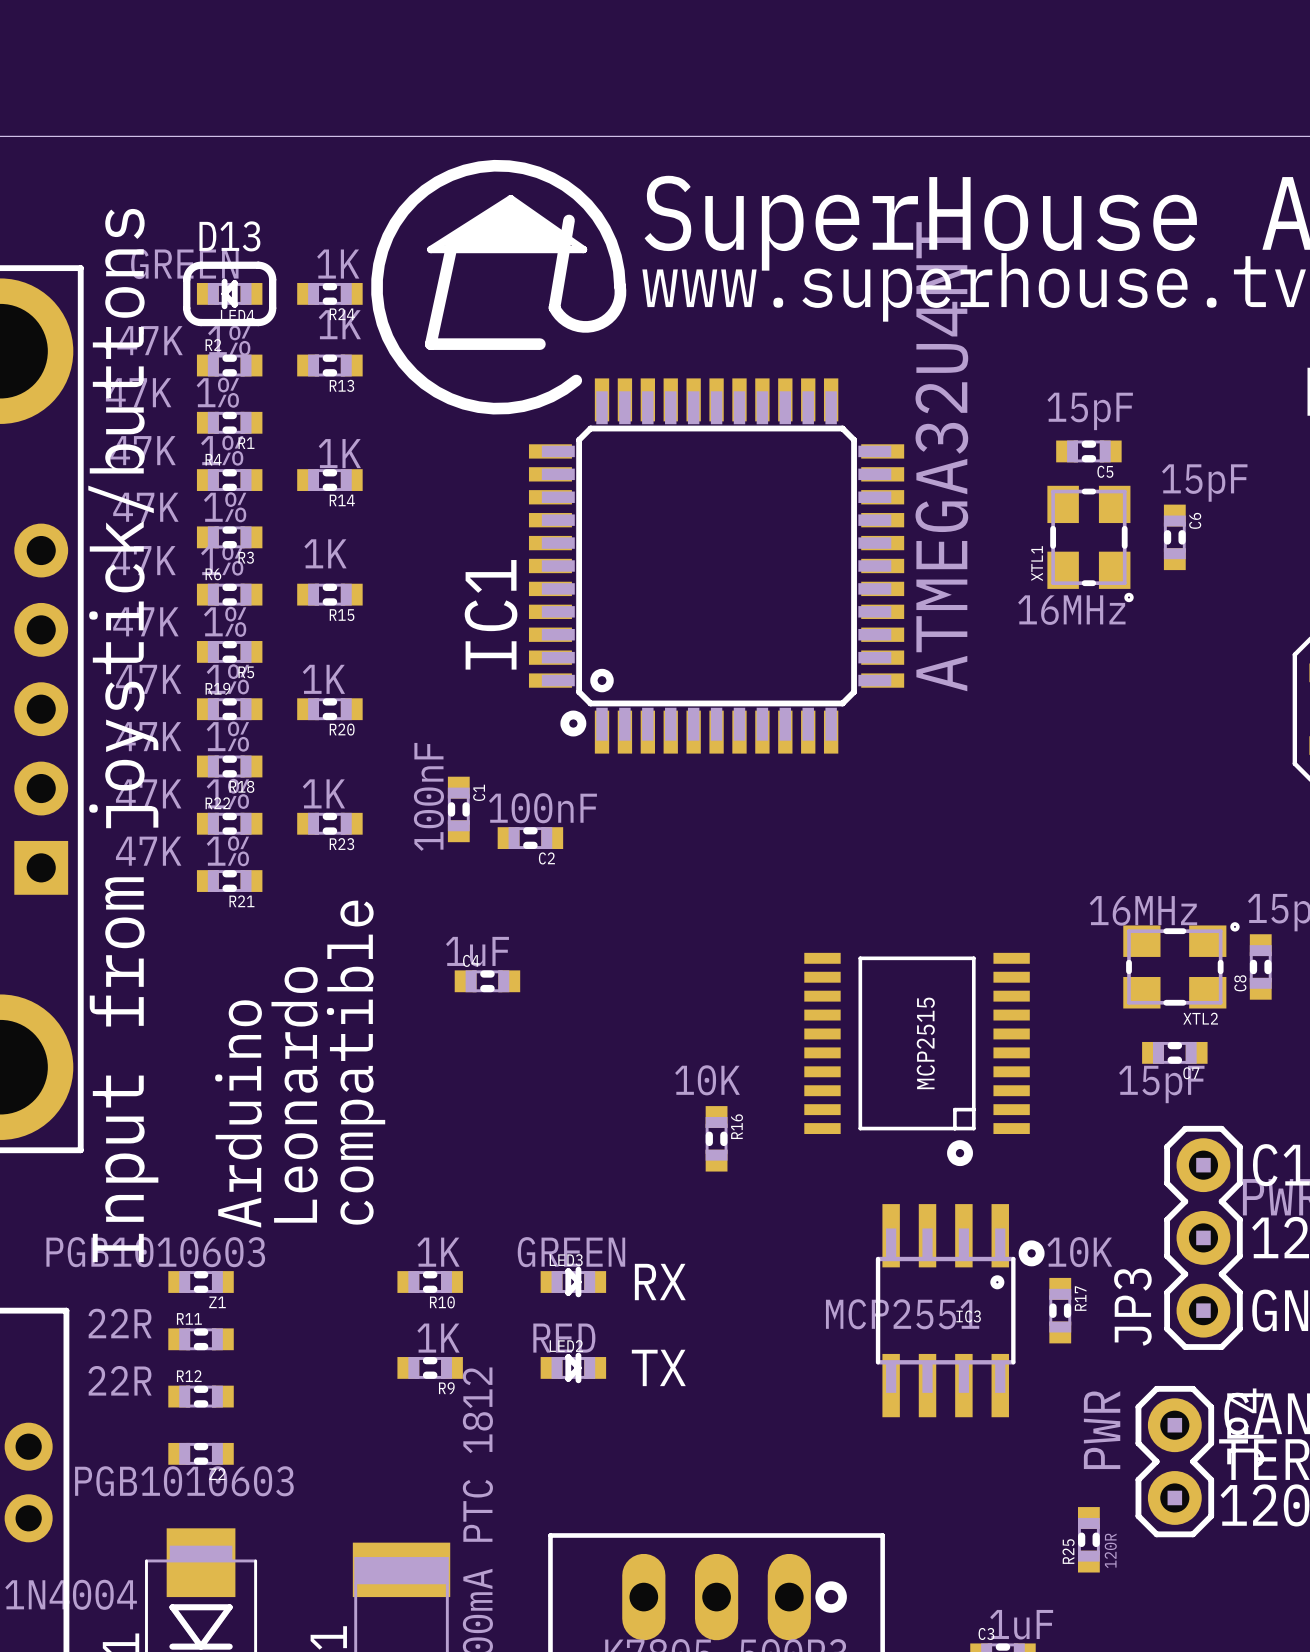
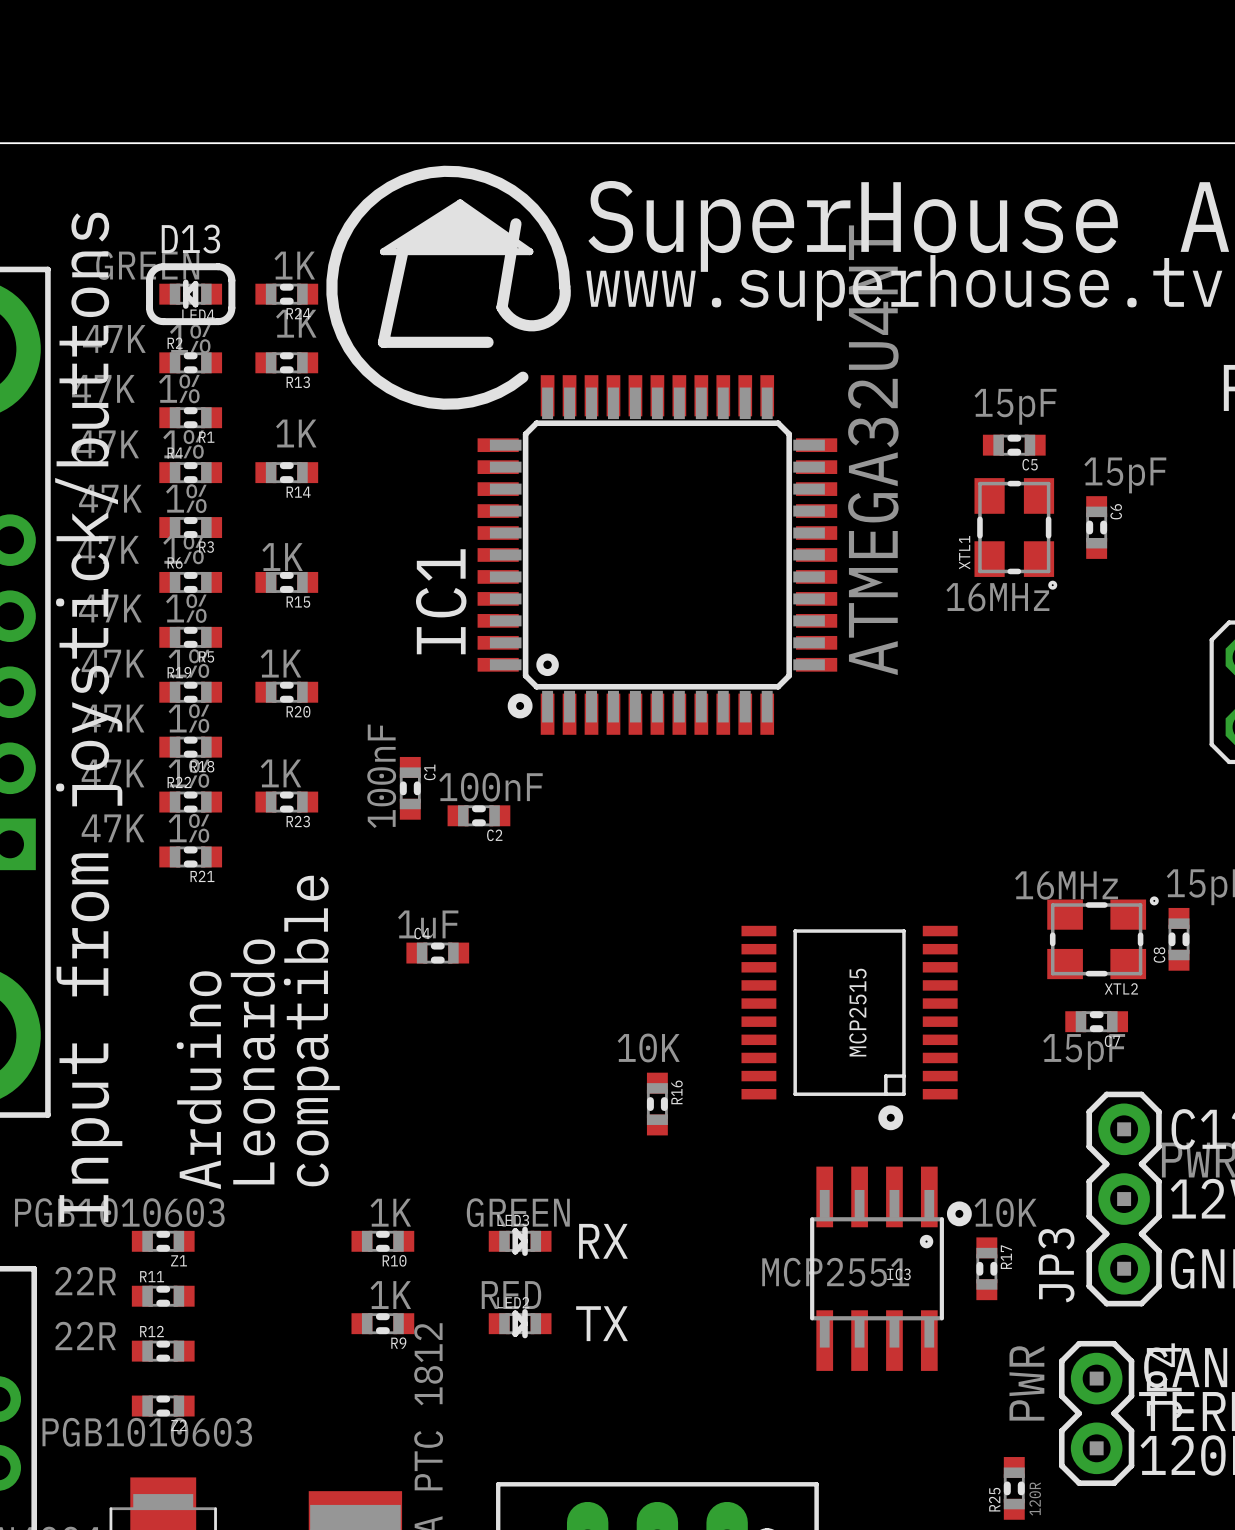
R14 value position: 1K (339, 453) -> 1K (296, 433)
R15 value position: 1K (325, 553) -> 1K (282, 557)

